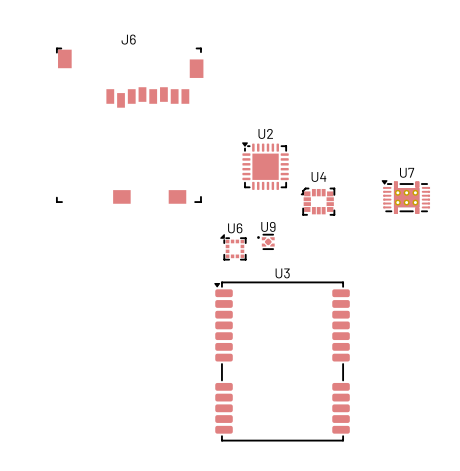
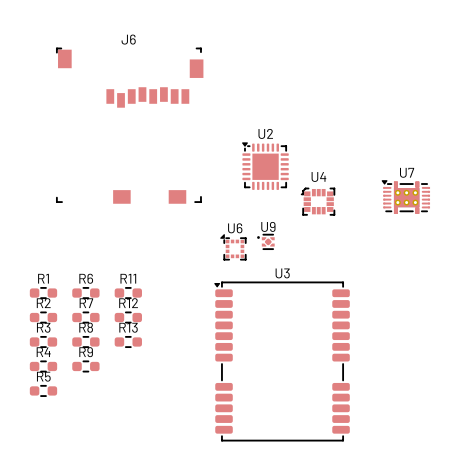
R1: none -> (43, 293)
R6: none -> (85, 293)
R11: none -> (128, 293)
R2: none -> (43, 317)
R7: none -> (85, 317)
R12: none -> (128, 317)
R3: none -> (43, 341)
R8: none -> (85, 341)
R13: none -> (128, 341)
R4: none -> (43, 366)
R9: none -> (85, 366)
R5: none -> (43, 390)

